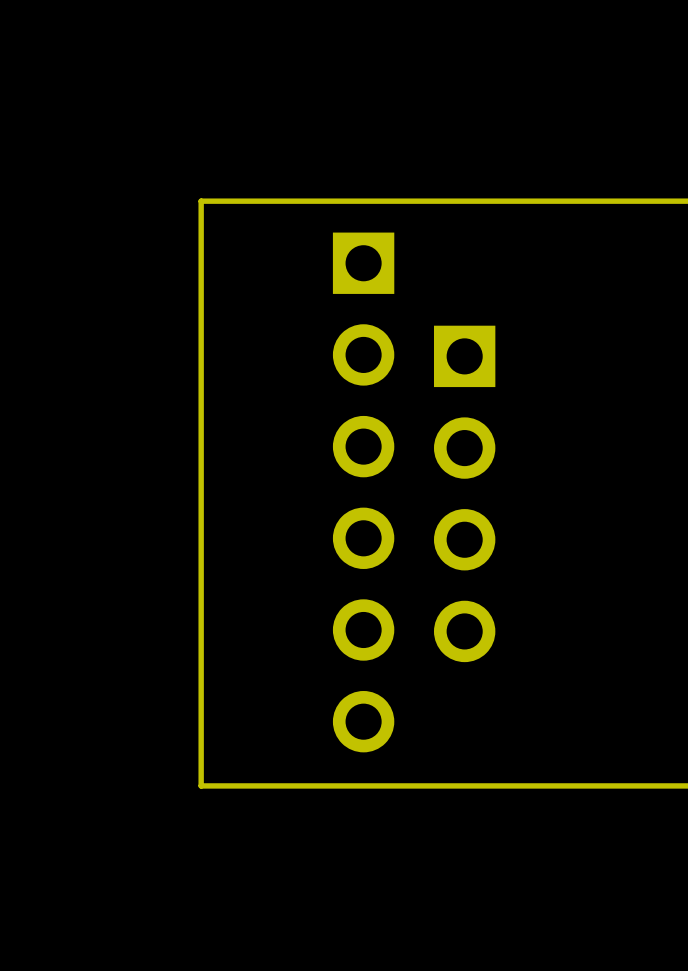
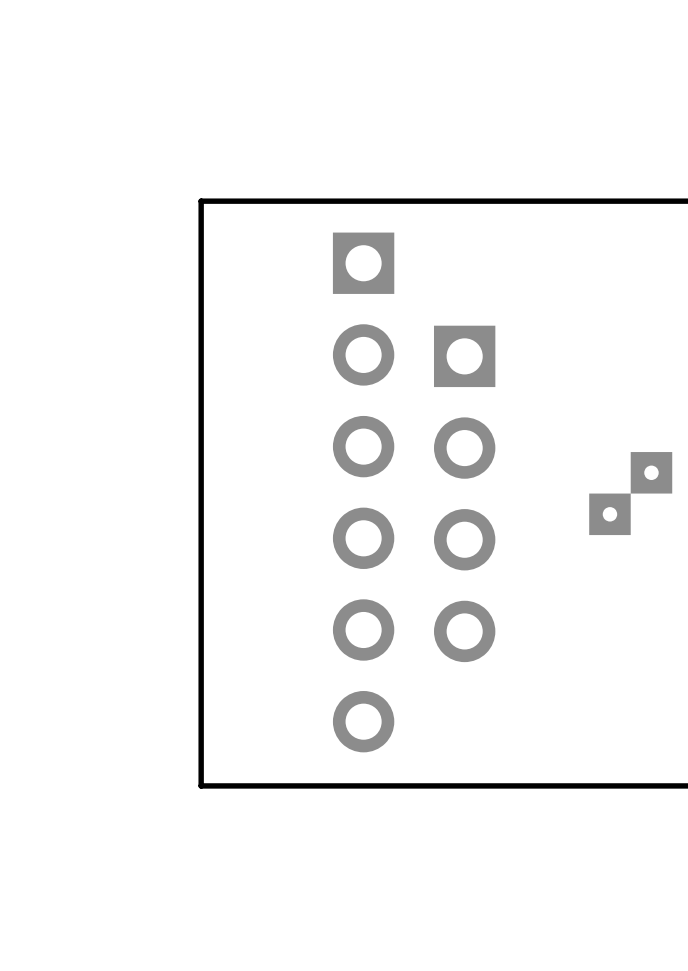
part: none -> (630, 493)

